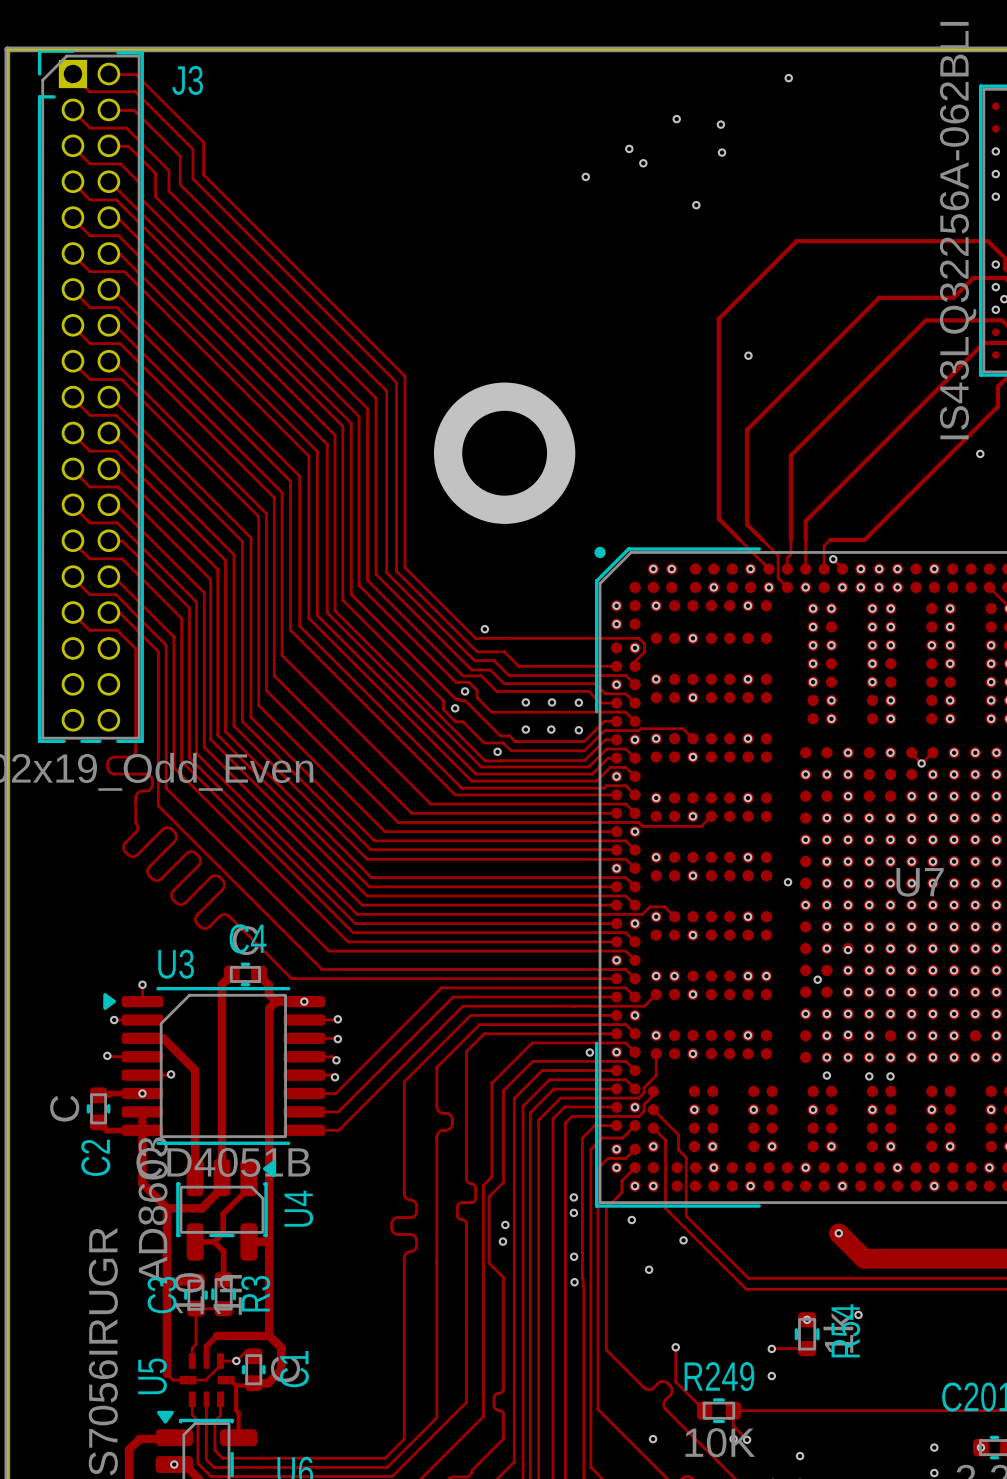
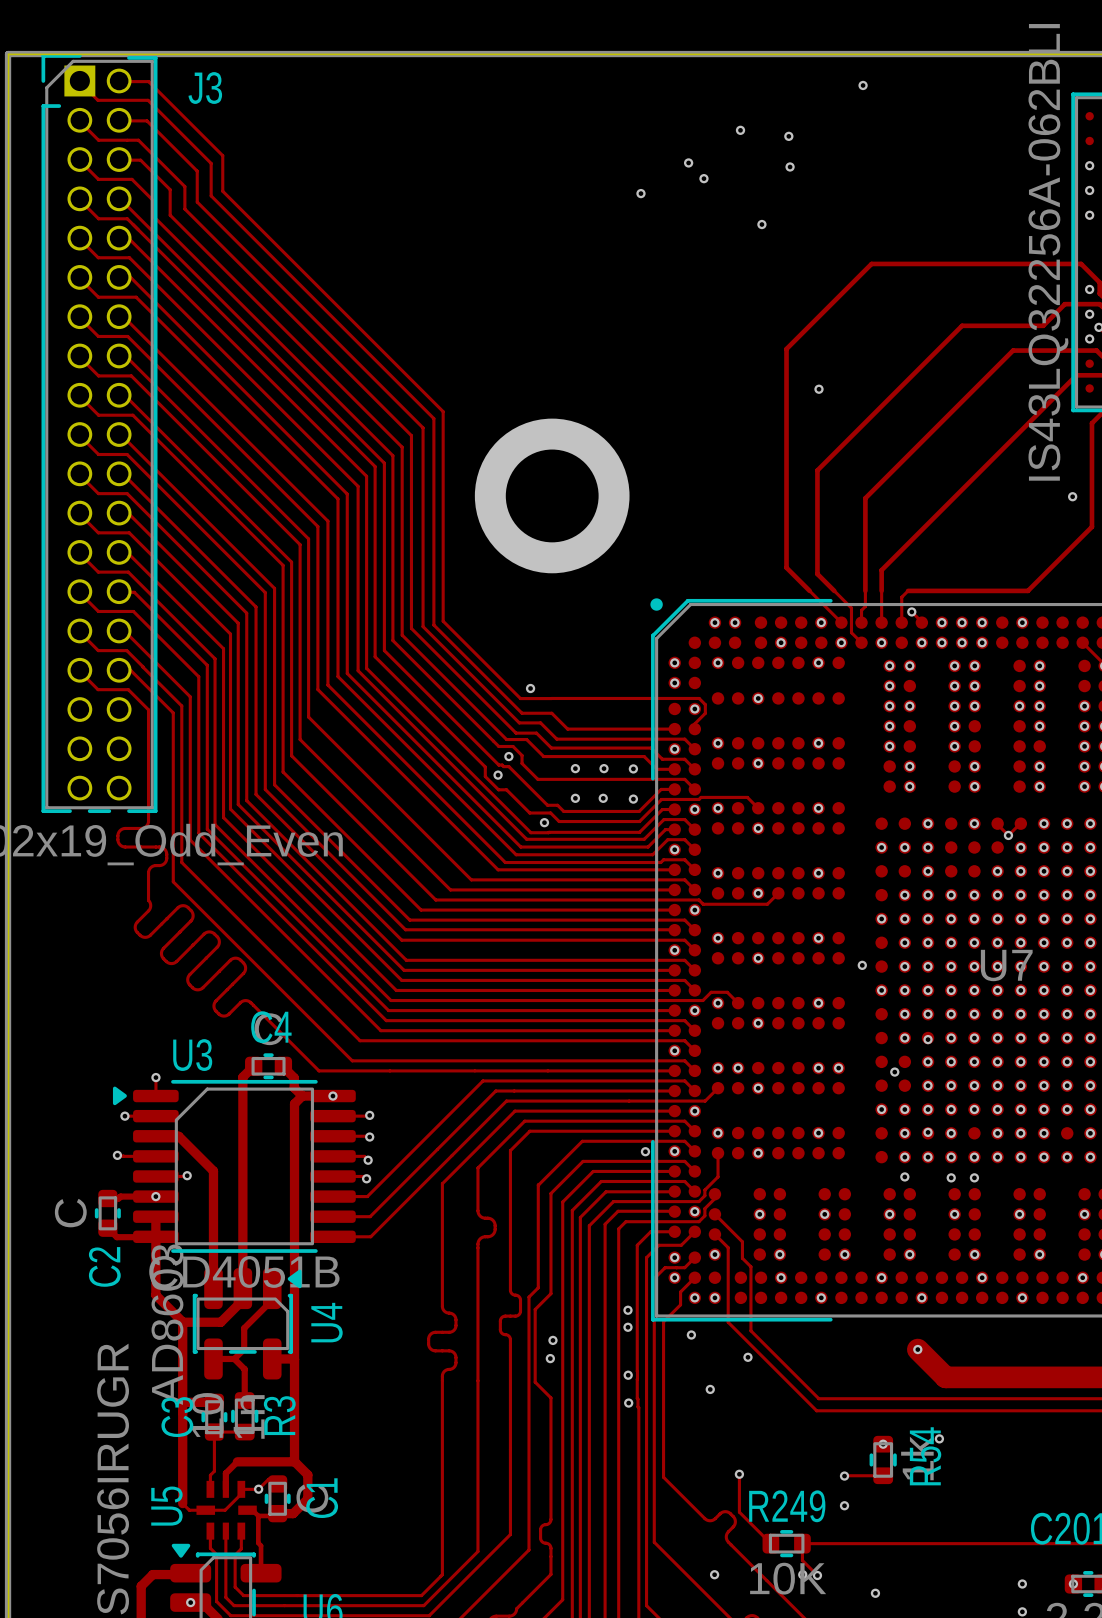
track: (997, 406) (864, 540) -> (1091, 444) (1091, 526) (1027, 590) (945, 590)

